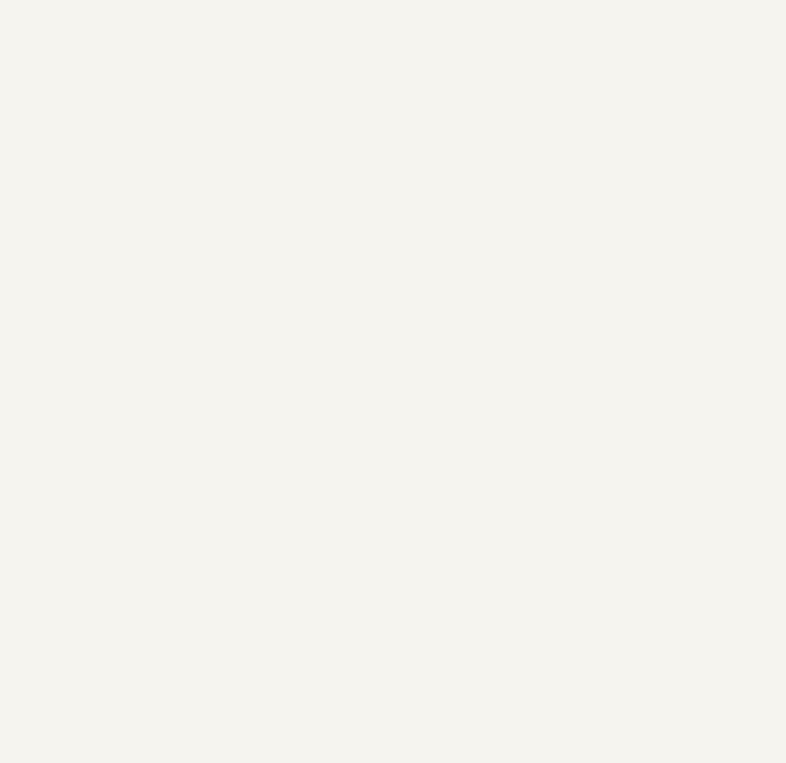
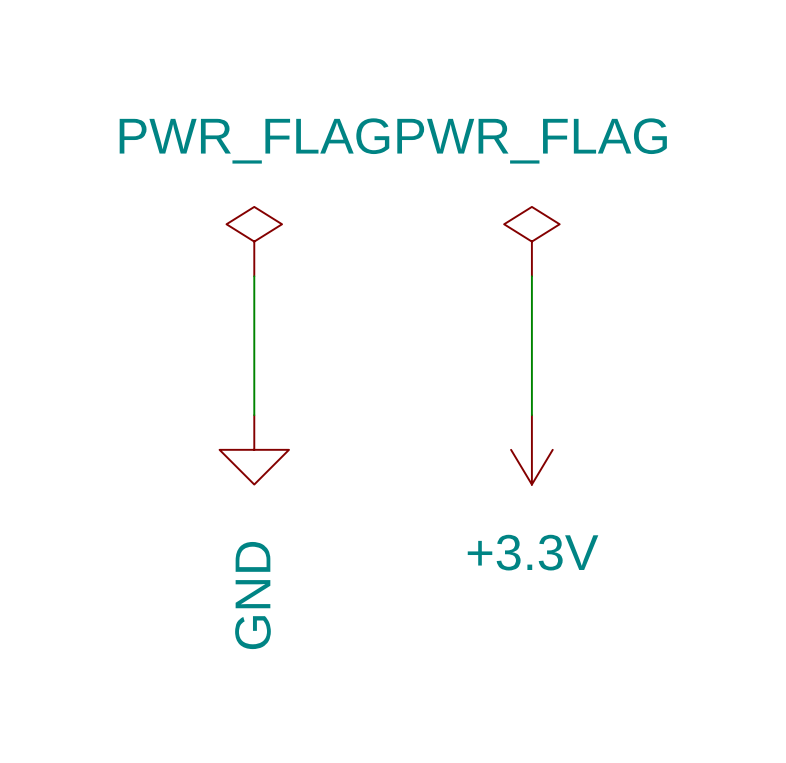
power symbol: none -> PWR_FLAG (254, 241)
power symbol: none -> PWR_FLAG (531, 241)
wire: none -> (254, 276) (254, 415)
wire: none -> (531, 276) (531, 415)
power symbol: none -> GND (254, 449)
power symbol: none -> +3.3V (531, 449)

